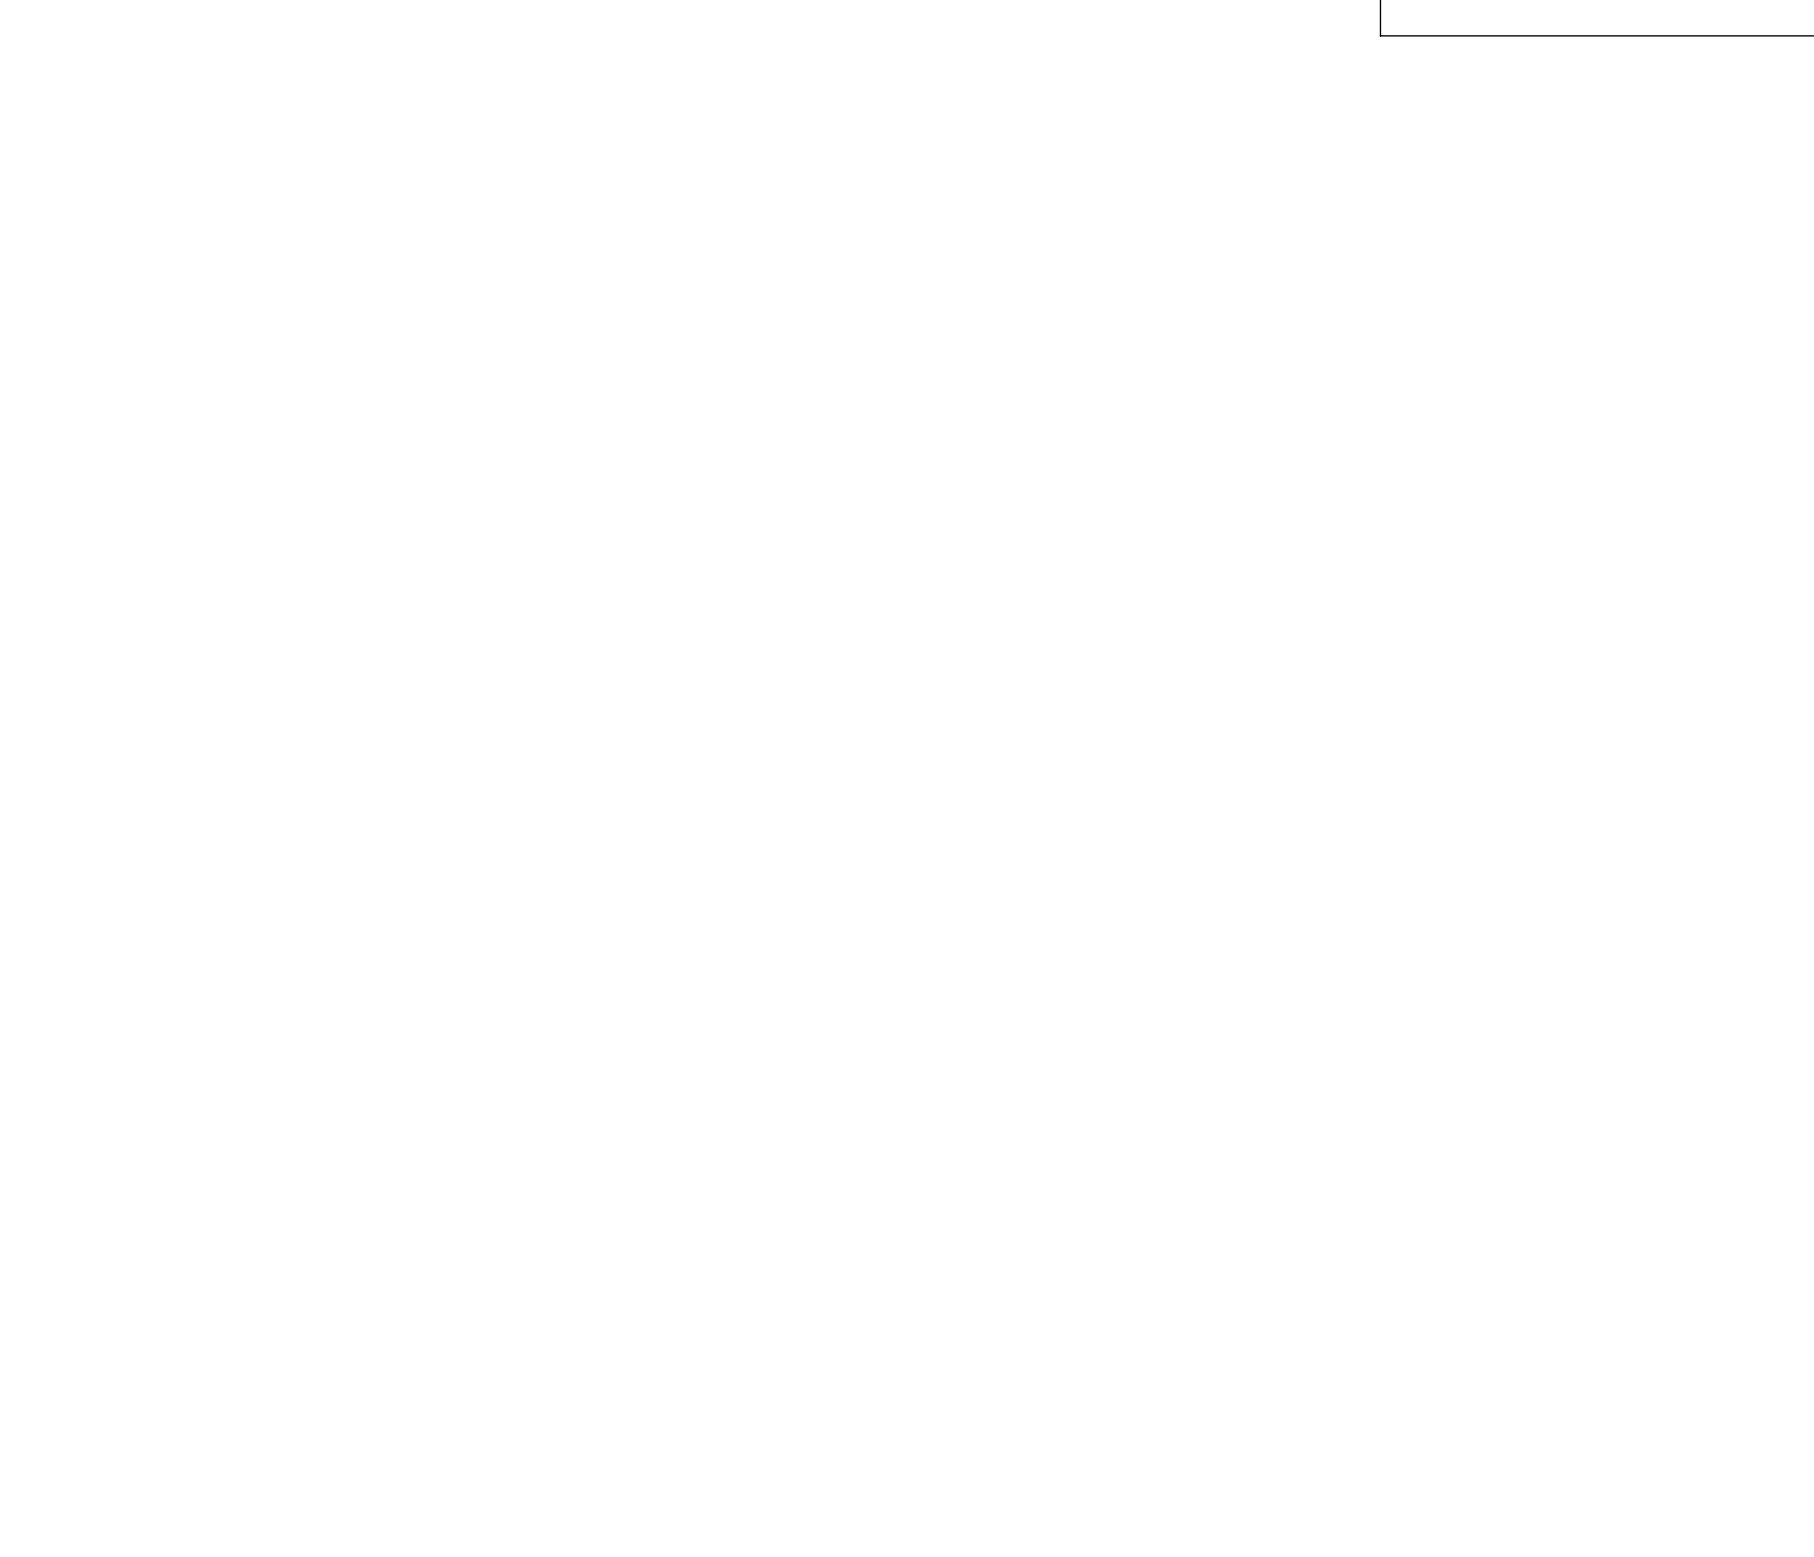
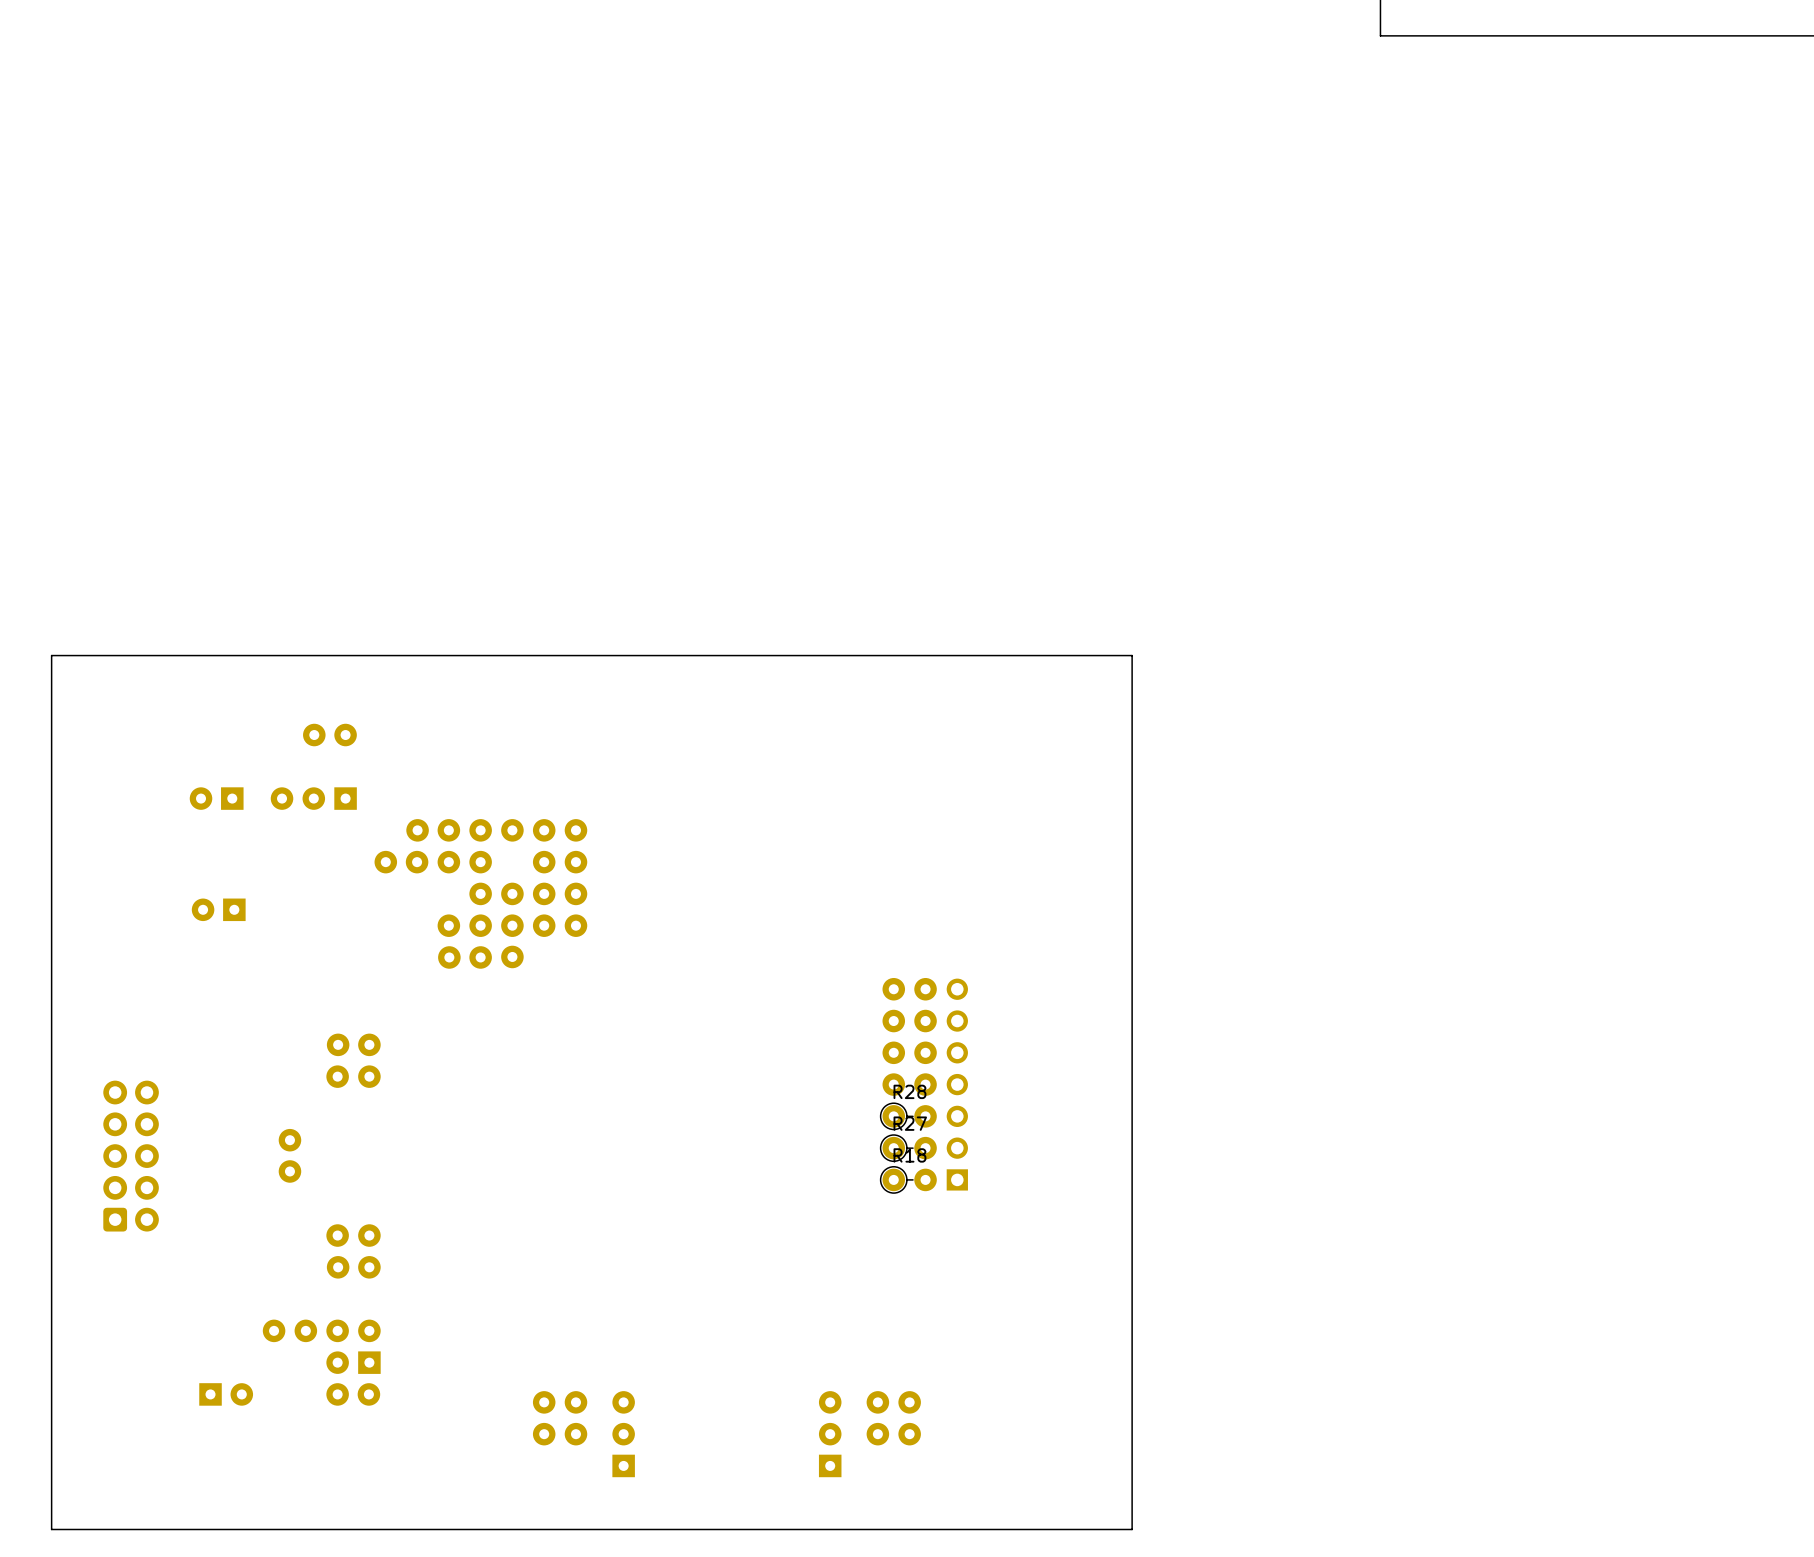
board edge: none -> (1132, 655) (51, 655) (51, 1529) (1132, 1529) (1132, 655)
part: none -> (329, 735)
part: none -> (216, 798)
part: none -> (313, 798)
part: none -> (433, 830)
part: none -> (496, 830)
part: none -> (560, 830)
part: none -> (401, 862)
part: none -> (464, 862)
part: none -> (560, 862)
part: none -> (496, 893)
part: none -> (560, 893)
part: none -> (218, 909)
part: none -> (464, 925)
part: none -> (560, 925)
part: none -> (512, 941)
part: none -> (465, 957)
part: none -> (909, 989)
part: none -> (909, 1021)
part: none -> (353, 1044)
part: none -> (909, 1052)
part: none -> (353, 1076)
part: none -> (909, 1084)
part: none -> (957, 1084)
R28: none -> (908, 1116)
R27: none -> (908, 1148)
part: none -> (289, 1155)
part: none -> (131, 1156)
R18: none -> (908, 1179)
part: none -> (353, 1235)
part: none -> (353, 1267)
part: none -> (289, 1330)
part: none -> (353, 1330)
part: none -> (353, 1362)
part: none -> (226, 1394)
part: none -> (353, 1394)
part: none -> (560, 1402)
part: none -> (893, 1402)
part: none -> (560, 1434)
part: none -> (623, 1434)
part: none -> (830, 1434)
part: none -> (893, 1434)

